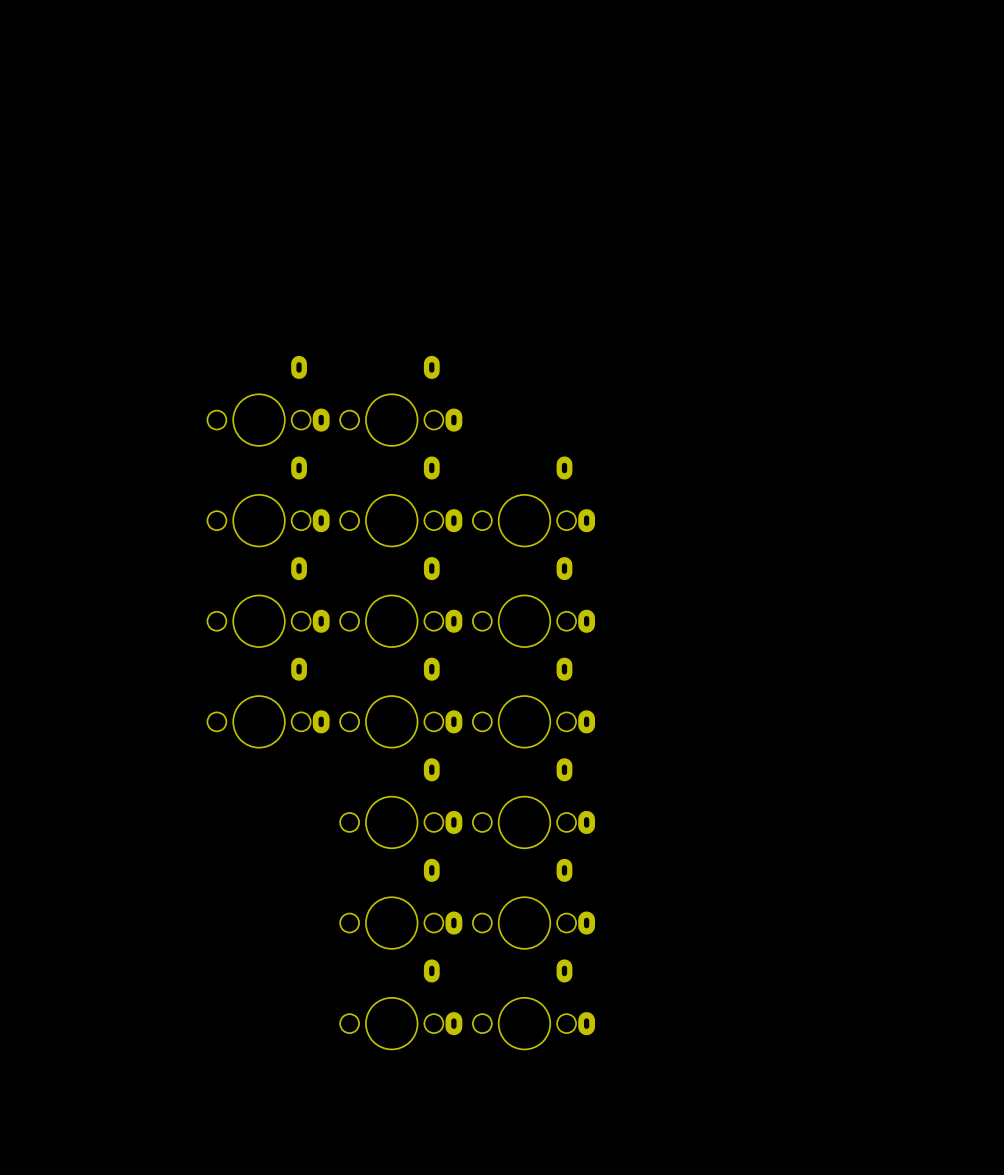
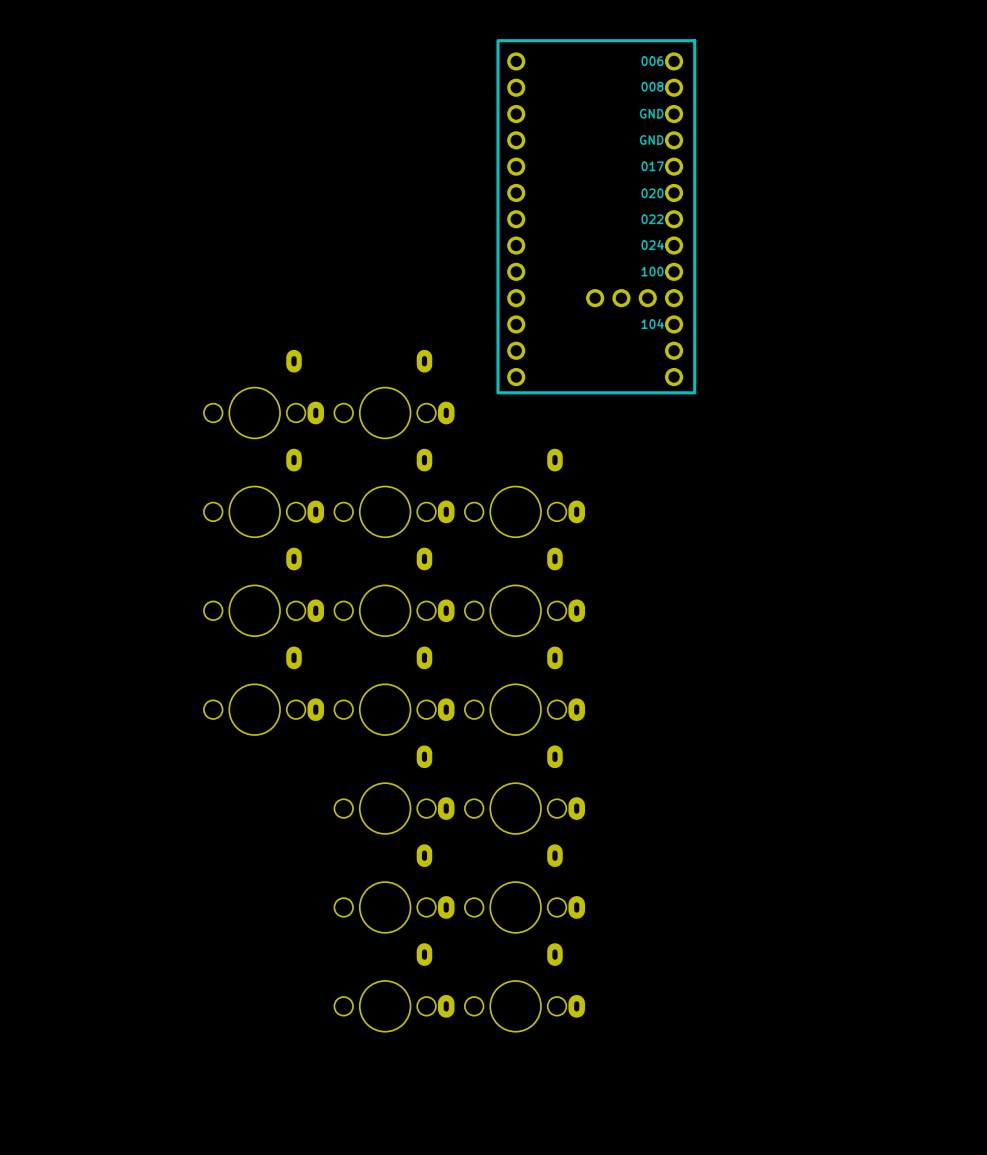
part: none -> (596, 216)

